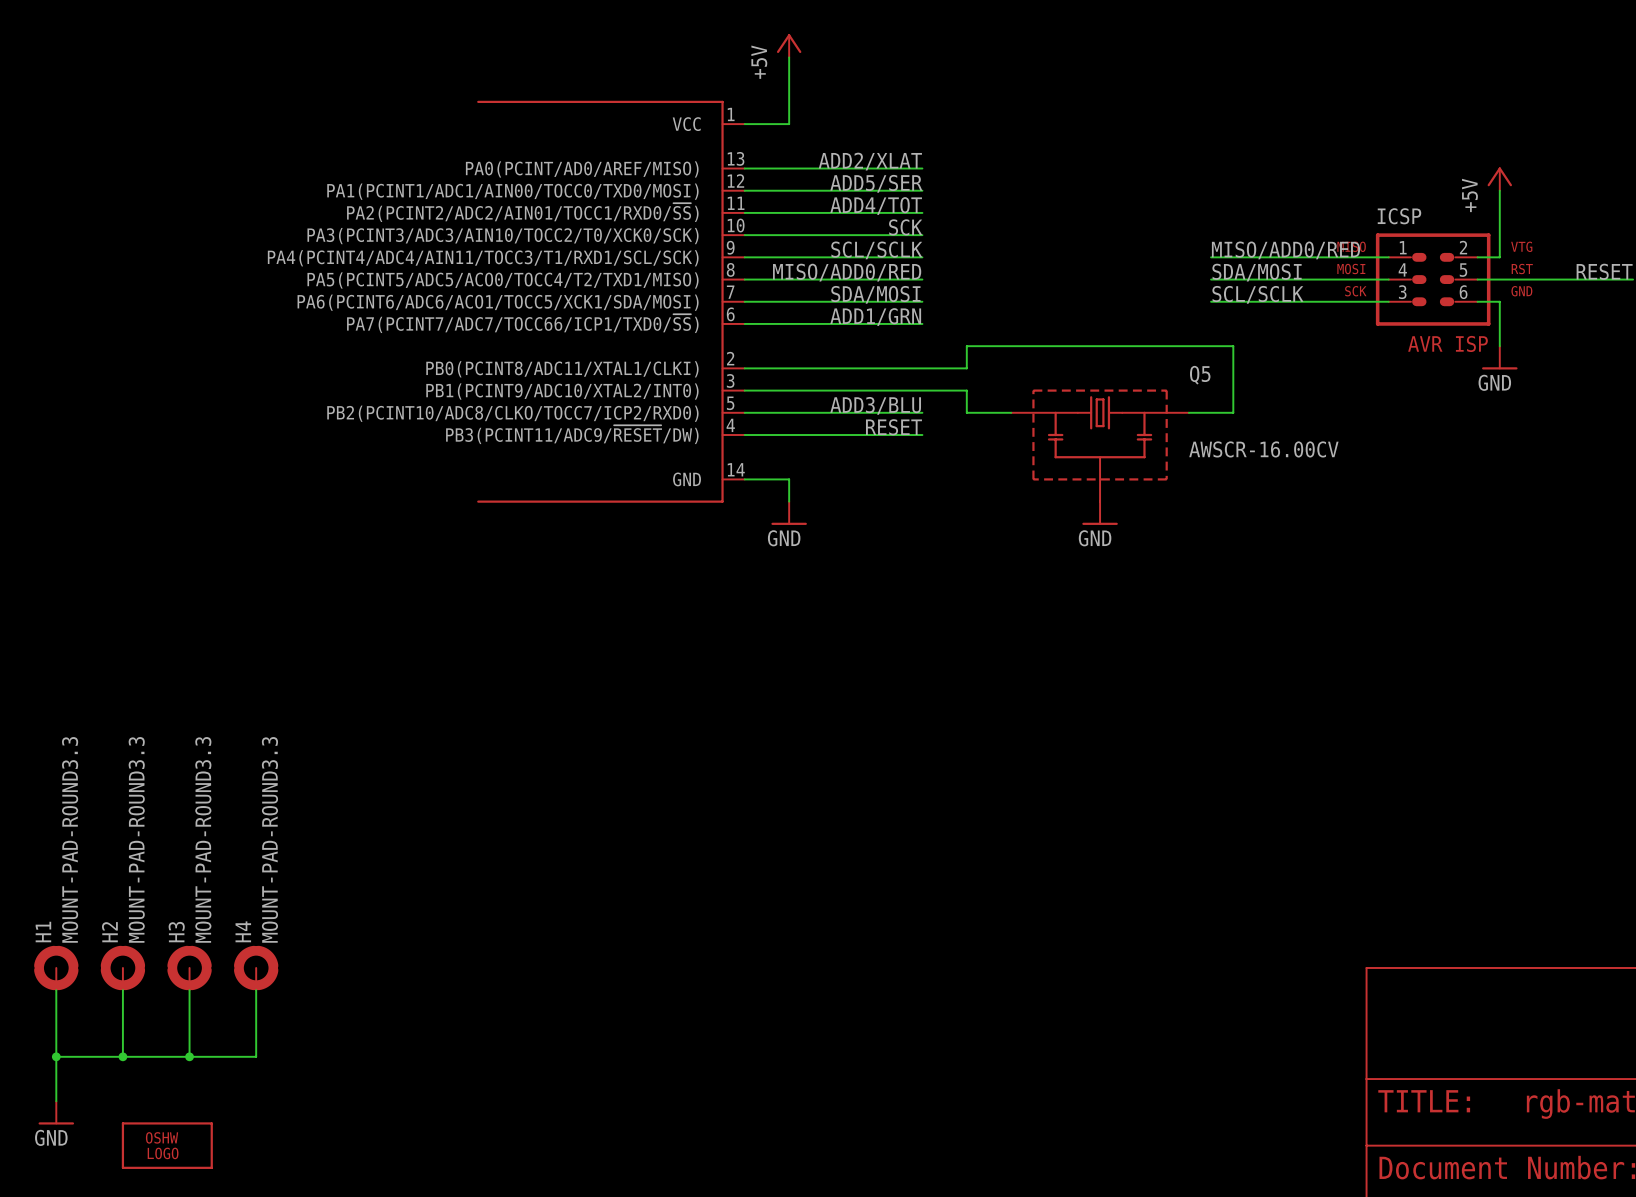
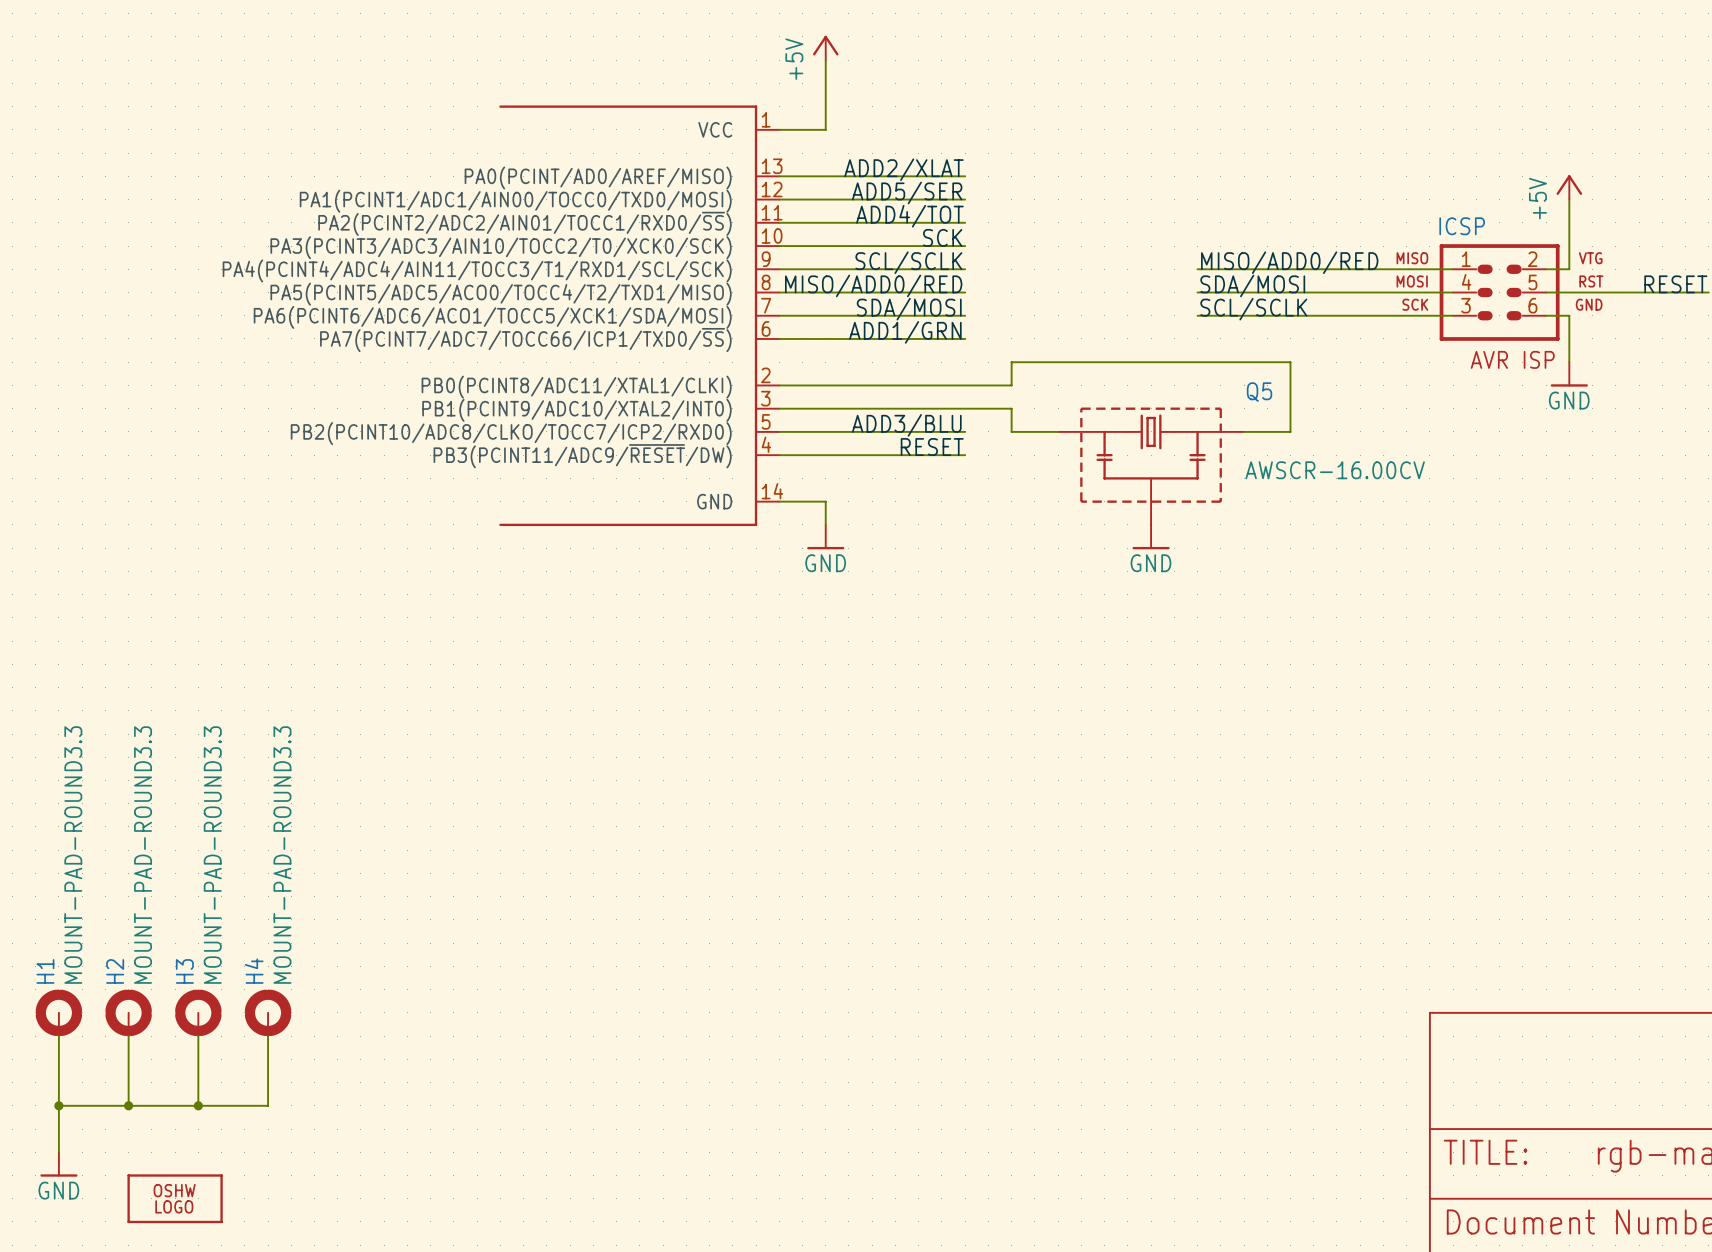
label position: MISO/ADD0/RED (1286, 250) -> MISO/ADD0/RED (1289, 262)
wire: none -> (1197, 269) (1267, 269)
label position: SDA/MOSI (1257, 272) -> SDA/MOSI (1252, 285)
wire: none -> (1197, 292) (1267, 292)
label position: SCL/SCLK (1257, 294) -> SCL/SCLK (1253, 309)
wire: none -> (1197, 315) (1267, 315)

